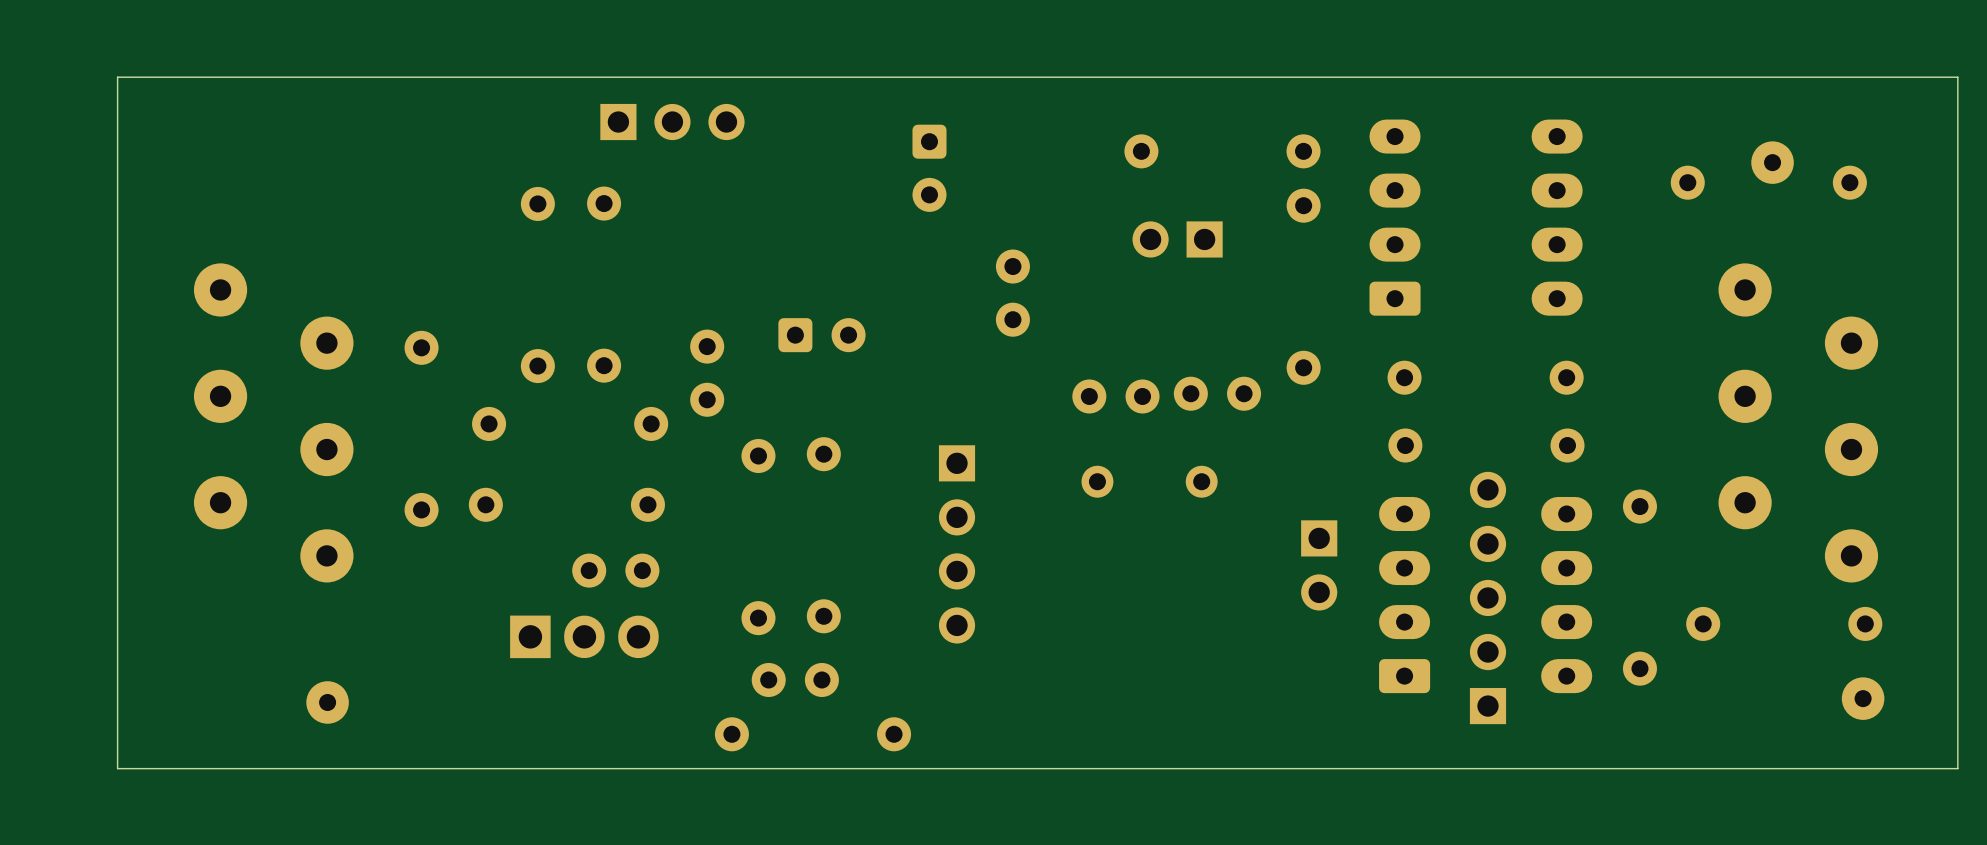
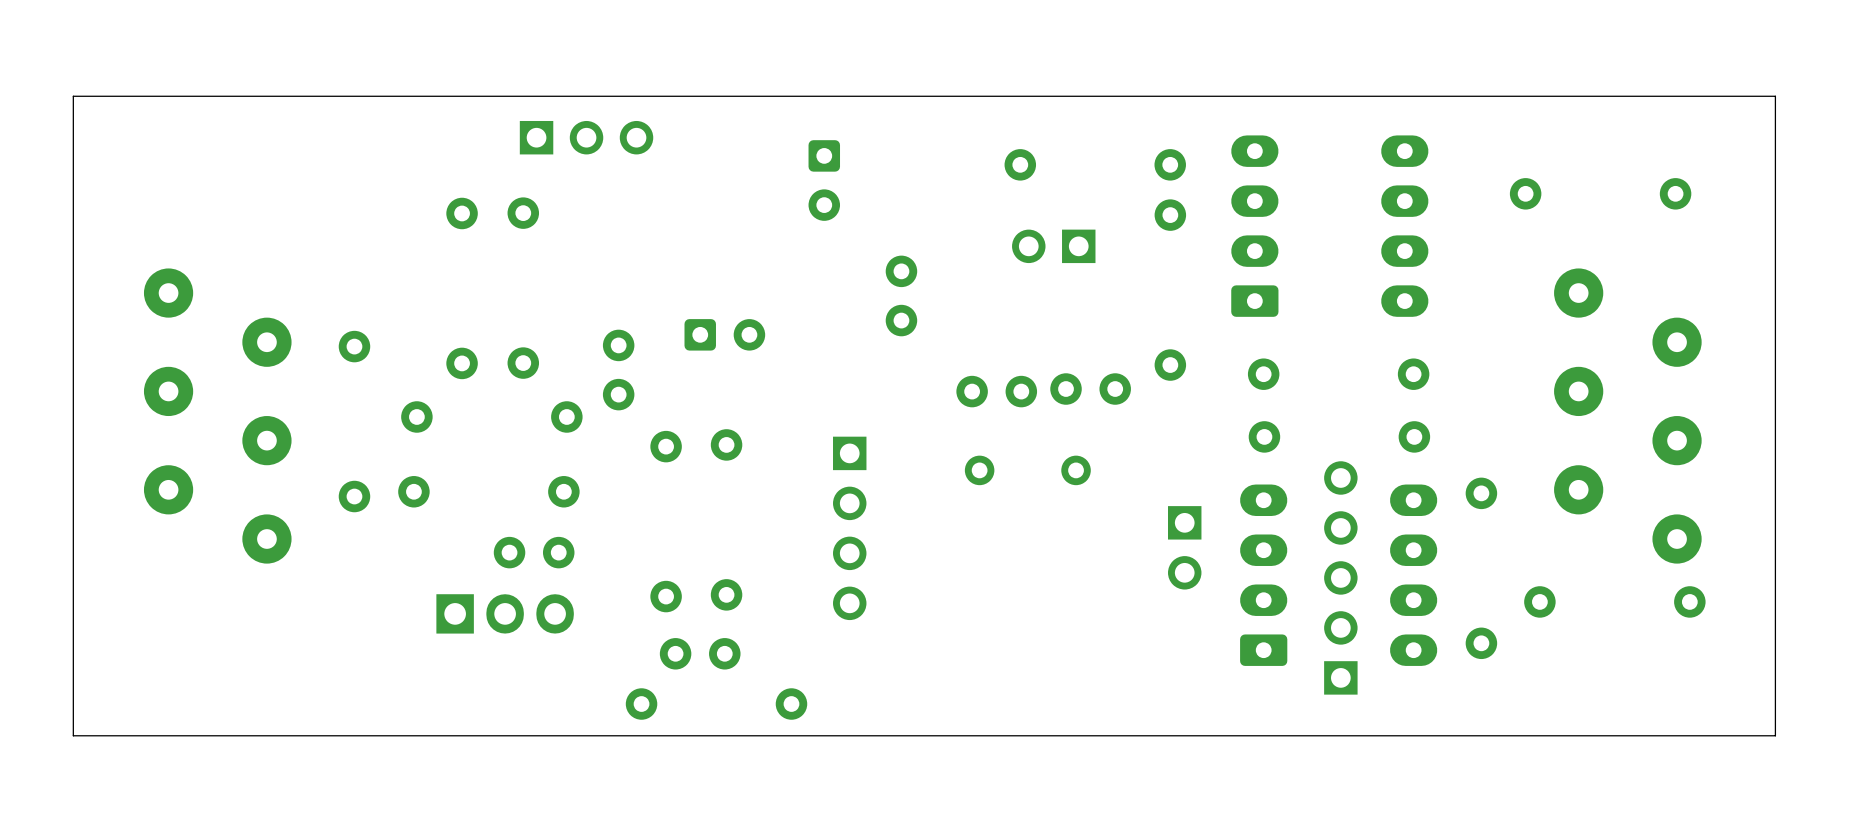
part: (1772, 162) -> none
part: (1863, 698) -> none
part: (327, 702) -> none

